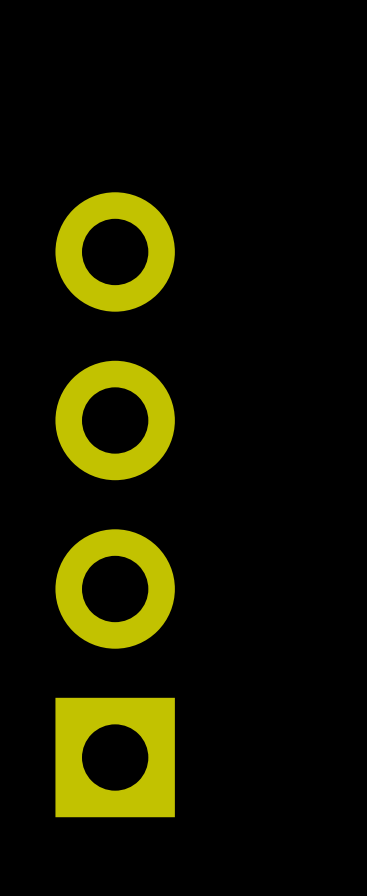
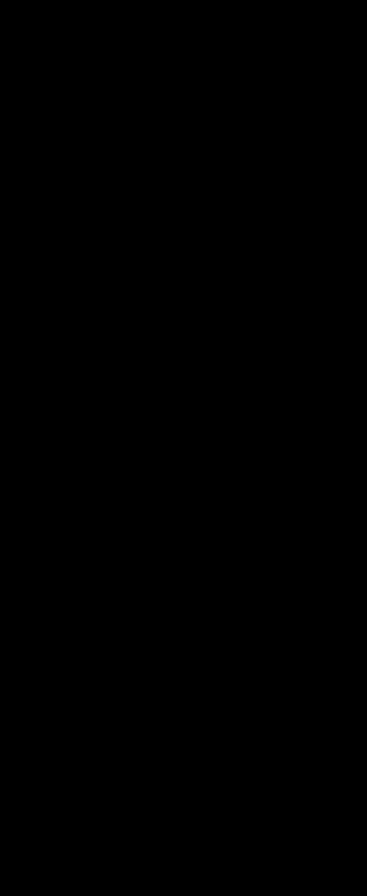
part: (115, 504) -> none

